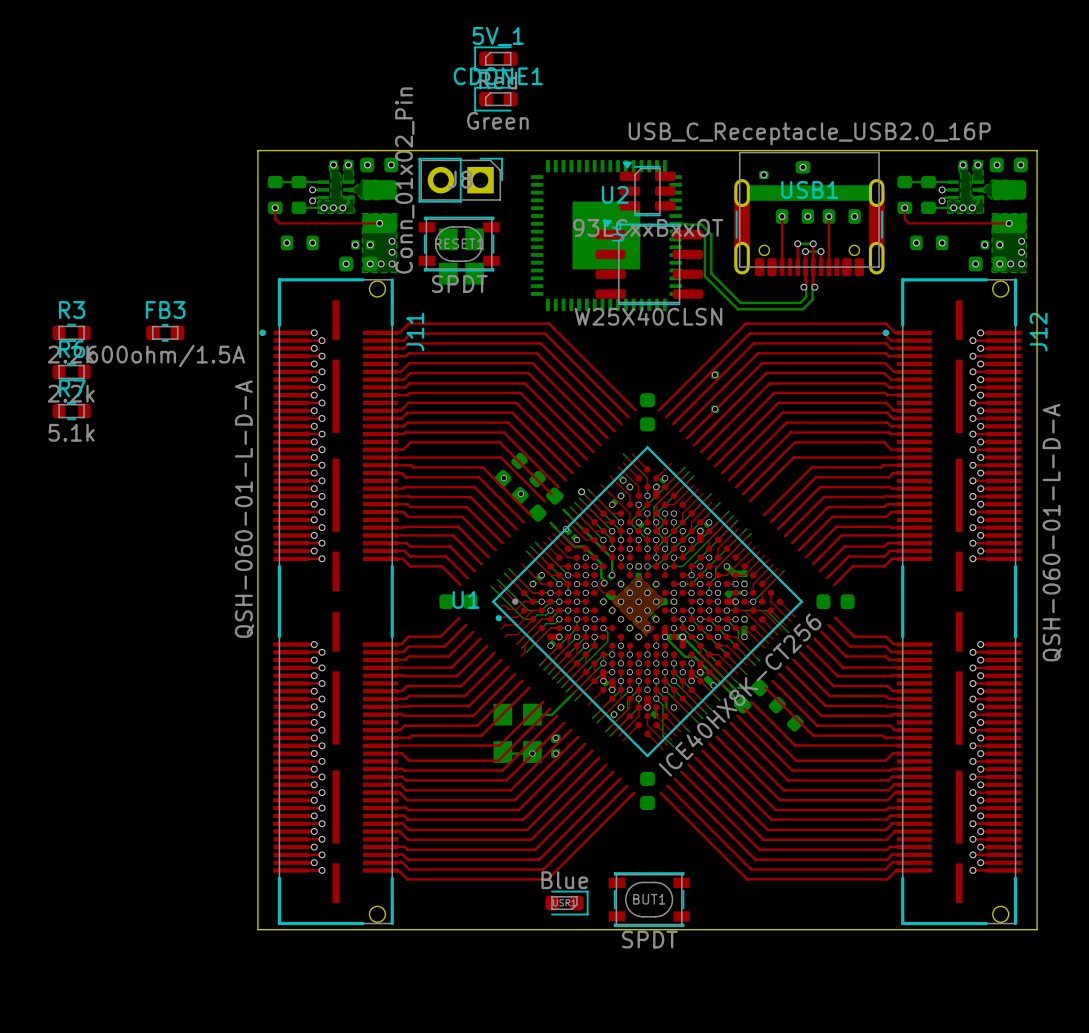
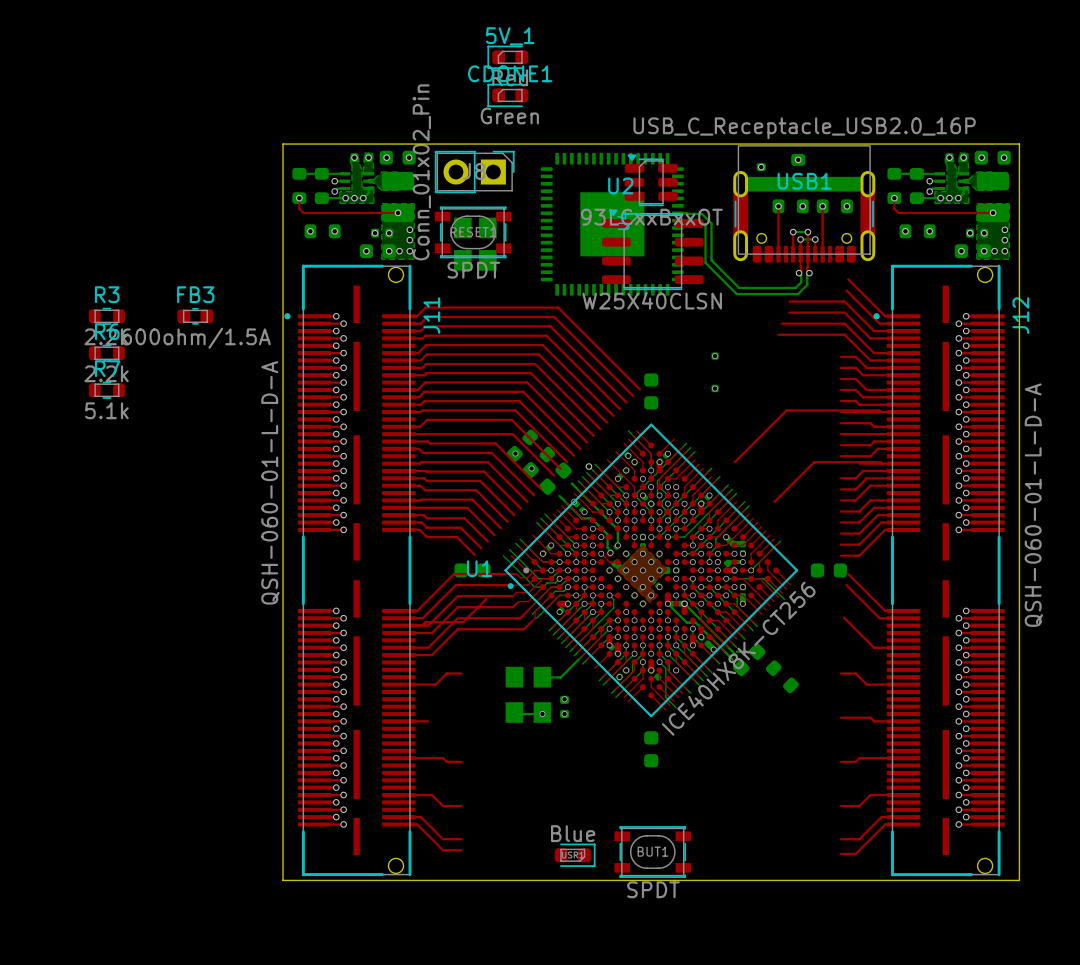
top track: (885, 323) (745, 323) (659, 410) -> (876, 307) (848, 279)
top track: (891, 340) (883, 333) (749, 333) (666, 417) -> (881, 323) (846, 290)
top track: (890, 348) (885, 343) (753, 343) (673, 424) -> (881, 331) (874, 331) (844, 301) (789, 301)
top track: (888, 356) (885, 353) (757, 353) (680, 431) -> (879, 338) (870, 338) (844, 312) (789, 312)
top track: (893, 371) (885, 363) (762, 363) (687, 438) -> (884, 353) (874, 353) (844, 323) (782, 323)
top track: (890, 379) (884, 373) (766, 373) (694, 445) -> (881, 360) (870, 360) (844, 334) (778, 334)
top track: (889, 387) (885, 383) (769, 383) (701, 452) -> (879, 367) (866, 367) (855, 356) (841, 356)
top track: (887, 395) (884, 392) (774, 392) (708, 459) -> (877, 375) (863, 375) (855, 367) (841, 367)
top track: (893, 410) (886, 402) (778, 402) (715, 466) -> (884, 389) (866, 389) (855, 378) (841, 378)
top track: (892, 418) (887, 412) (782, 412) (722, 473) -> (883, 397) (863, 397) (855, 389) (841, 389)
top track: (890, 426) (887, 422) (786, 422) (729, 480) -> (881, 404) (859, 404) (855, 401) (841, 401)
top track: (891, 449) (884, 442) (794, 442) (743, 494) -> (881, 426) (874, 426) (870, 423) (841, 423)
top track: (848, 457) (793, 457) (749, 501) -> none
top track: (881, 467) (811, 467) (763, 515) -> (872, 443) (870, 445) (841, 445)
top track: (892, 473) (888, 477) (815, 477) (770, 522) -> (883, 448) (877, 448) (870, 456) (841, 456)
top track: (885, 496) (824, 497) (784, 536) -> (875, 470) (863, 470) (855, 478) (841, 478)
top track: (887, 504) (884, 507) (828, 507) (791, 543) -> (877, 478) (866, 478) (855, 489) (841, 489)
top track: (891, 512) (886, 516) (832, 516) (798, 550) -> (881, 485) (870, 485) (855, 500) (841, 500)
top track: (891, 527) (836, 526) (805, 557) -> (881, 500) (870, 500) (859, 511) (841, 511)
top track: (883, 535) (841, 535) (812, 564) -> (874, 507) (859, 522) (841, 522)
top track: (887, 543) (884, 546) (844, 546) (819, 571) -> (878, 515) (859, 533) (841, 533)
top track: (891, 551) (884, 556) (848, 556) (826, 578) -> (881, 522) (859, 544) (841, 544)
top track: (895, 558) (892, 558) (884, 566) (852, 566) (833, 585) -> (885, 529) (859, 555) (841, 555)
top track: none -> (513, 574) (454, 574) (417, 610) (398, 610)
top track: none -> (848, 574) (885, 610) (903, 610)
top track: (459, 617) (440, 636) (408, 636) (401, 644) (379, 644) -> none
top track: none -> (513, 585) (455, 585) (422, 618) (398, 618)
top track: (835, 617) (854, 636) (885, 636) (893, 644) (915, 644) -> none
top track: none -> (846, 585) (879, 618) (903, 618)
top track: (466, 624) (444, 646) (408, 646) (403, 652) (379, 652) -> none
top track: (828, 624) (850, 646) (885, 646) (891, 652) (915, 652) -> none
top track: none -> (513, 596) (457, 596) (428, 625) (398, 625)
top track: (821, 631) (845, 656) (885, 656) (889, 659) (915, 659) -> none
top track: none -> (516, 603) (513, 607) (457, 607) (432, 632) (398, 632)
top track: (480, 638) (451, 667) (378, 667) -> none
top track: (814, 638) (843, 667) (915, 667) -> none
top track: none -> (527, 610) (520, 618) (457, 618) (428, 647) (398, 647)
top track: (487, 645) (456, 676) (379, 675) -> none
top track: (807, 645) (837, 676) (915, 675) -> none
top track: none -> (843, 617) (874, 647) (903, 647)
top track: (494, 652) (460, 686) (406, 686) (401, 691) (379, 691) -> none
top track: (800, 652) (833, 686) (887, 686) (892, 690) (915, 690) -> none
top track: none -> (531, 621) (524, 629) (457, 629) (432, 655) (398, 655)
top track: (501, 659) (465, 696) (408, 696) (406, 698) (379, 698) -> none
top track: (793, 659) (829, 696) (885, 696) (888, 698) (915, 698) -> none
top track: (508, 666) (469, 705) (379, 706) -> none
top track: (786, 666) (825, 705) (915, 706) -> none
top track: (515, 673) (473, 715) (379, 714) -> none
top track: (779, 673) (821, 715) (915, 714) -> none
top track: (522, 680) (477, 725) (404, 725) (400, 729) (378, 729) -> none
top track: (772, 680) (817, 725) (890, 725) (894, 729) (915, 729) -> none
top track: (529, 687) (481, 735) (378, 737) -> none
top track: (765, 687) (813, 735) (915, 737) -> none
top track: (543, 701) (499, 745) (378, 745) -> none
top track: (751, 701) (795, 745) (915, 745) -> none
top track: (550, 708) (498, 760) (409, 760) (401, 753) (379, 753) -> none
top track: (744, 708) (796, 760) (885, 760) (892, 753) (915, 753) -> none
top track: none -> (461, 673) (446, 673) (435, 684) (398, 684)
top track: none -> (841, 673) (855, 673) (866, 684) (903, 684)
top track: (557, 715) (502, 770) (379, 768) -> none
top track: (737, 715) (792, 770) (915, 768) -> none
top track: (564, 722) (506, 780) (406, 780) (402, 776) (378, 776) -> none
top track: (730, 722) (788, 780) (888, 780) (892, 776) (915, 776) -> none
top track: (571, 729) (510, 790) (406, 790) (400, 784) (378, 784) -> none
top track: (723, 729) (783, 790) (888, 790) (894, 784) (915, 784) -> none
top track: (578, 736) (514, 800) (407, 800) (399, 792) (378, 792) -> none
top track: (716, 736) (779, 800) (887, 800) (895, 792) (915, 792) -> none
top track: (585, 743) (518, 810) (408, 810) (406, 807) (378, 807) -> none
top track: (709, 743) (775, 810) (886, 810) (888, 807) (915, 807) -> none
top track: (592, 750) (523, 819) (407, 819) (403, 815) (378, 815) -> none
top track: (702, 750) (771, 819) (886, 819) (890, 815) (915, 815) -> none
top track: (599, 757) (527, 829) (408, 829) (402, 823) (378, 823) -> none
top track: (695, 757) (767, 829) (885, 829) (892, 823) (915, 823) -> none
top track: none -> (841, 717) (870, 717) (874, 721) (903, 721)
top track: none -> (398, 721) (428, 721)
top track: (606, 764) (531, 839) (407, 839) (399, 831) (378, 831) -> none
top track: (688, 764) (763, 839) (886, 839) (895, 831) (915, 831) -> none
top track: (613, 771) (535, 849) (407, 849) (404, 846) (378, 846) -> none
top track: (681, 771) (759, 849) (887, 849) (890, 846) (915, 846) -> none
top track: (620, 778) (539, 859) (407, 859) (402, 854) (378, 854) -> none
top track: (674, 778) (755, 859) (887, 859) (892, 854) (915, 854) -> none
top track: (627, 785) (543, 869) (409, 869) (402, 862) (378, 862) -> none
top track: (667, 785) (751, 869) (885, 869) (892, 862) (915, 862) -> none
top track: (634, 792) (547, 879) (407, 879) (398, 870) (378, 870) -> none
top track: (660, 792) (747, 879) (887, 879) (896, 870) (915, 870) -> none
top track: none -> (398, 758) (443, 758) (446, 761) (461, 761)
top track: none -> (903, 758) (859, 758) (855, 761) (841, 761)
top track: none -> (398, 795) (432, 795) (443, 806) (461, 806)
top track: none -> (903, 795) (870, 795) (859, 806) (841, 806)
top track: none -> (398, 817) (420, 817) (443, 839) (461, 839)
top track: none -> (903, 817) (881, 817) (859, 839) (841, 839)
top track: none -> (398, 824) (417, 824) (443, 850) (461, 850)
top track: none -> (903, 824) (885, 824) (855, 853) (841, 853)

